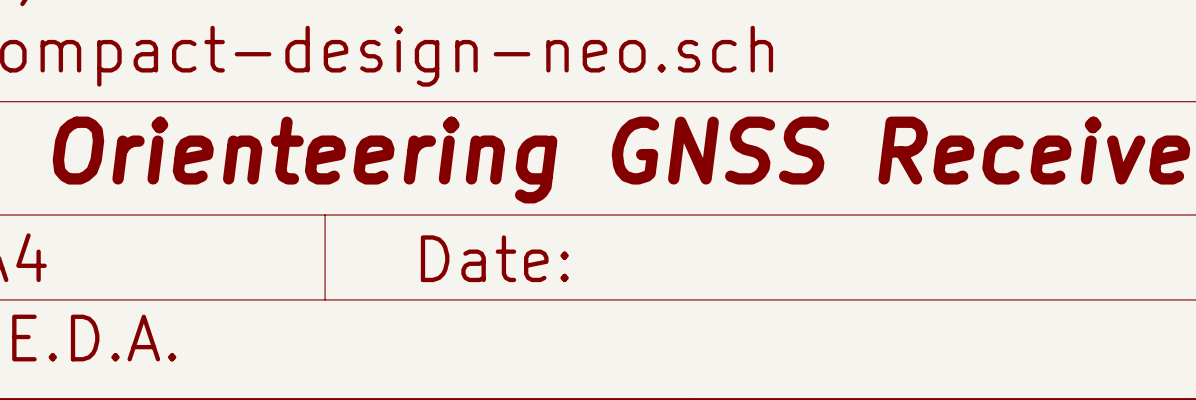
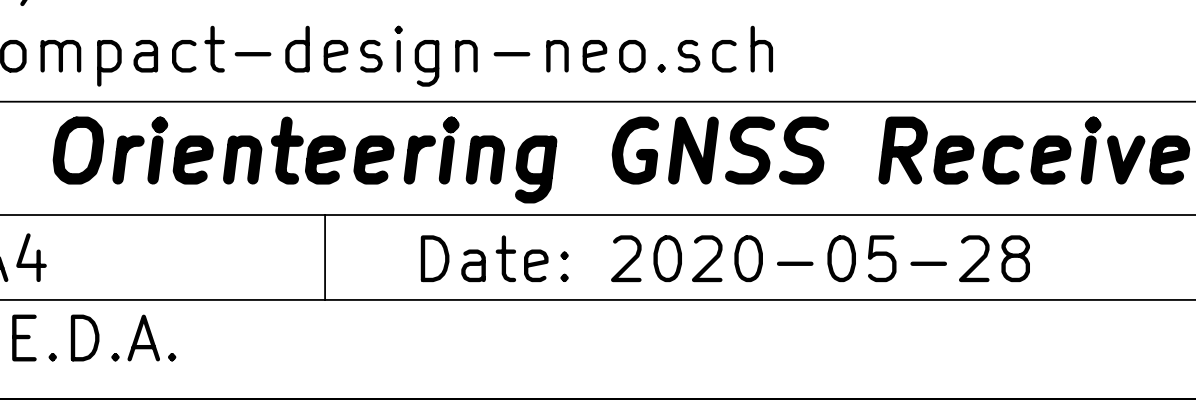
title block: Date: (494, 258) -> Date: 2020-05-28 (725, 258)

